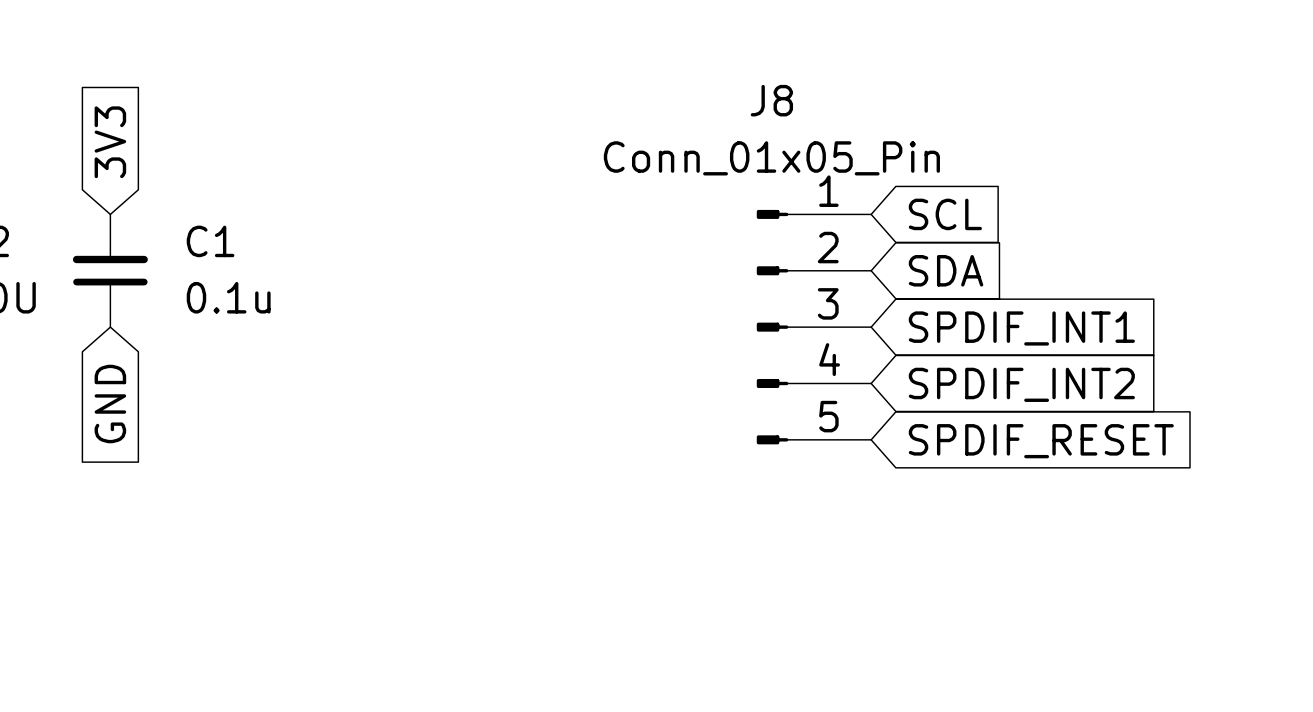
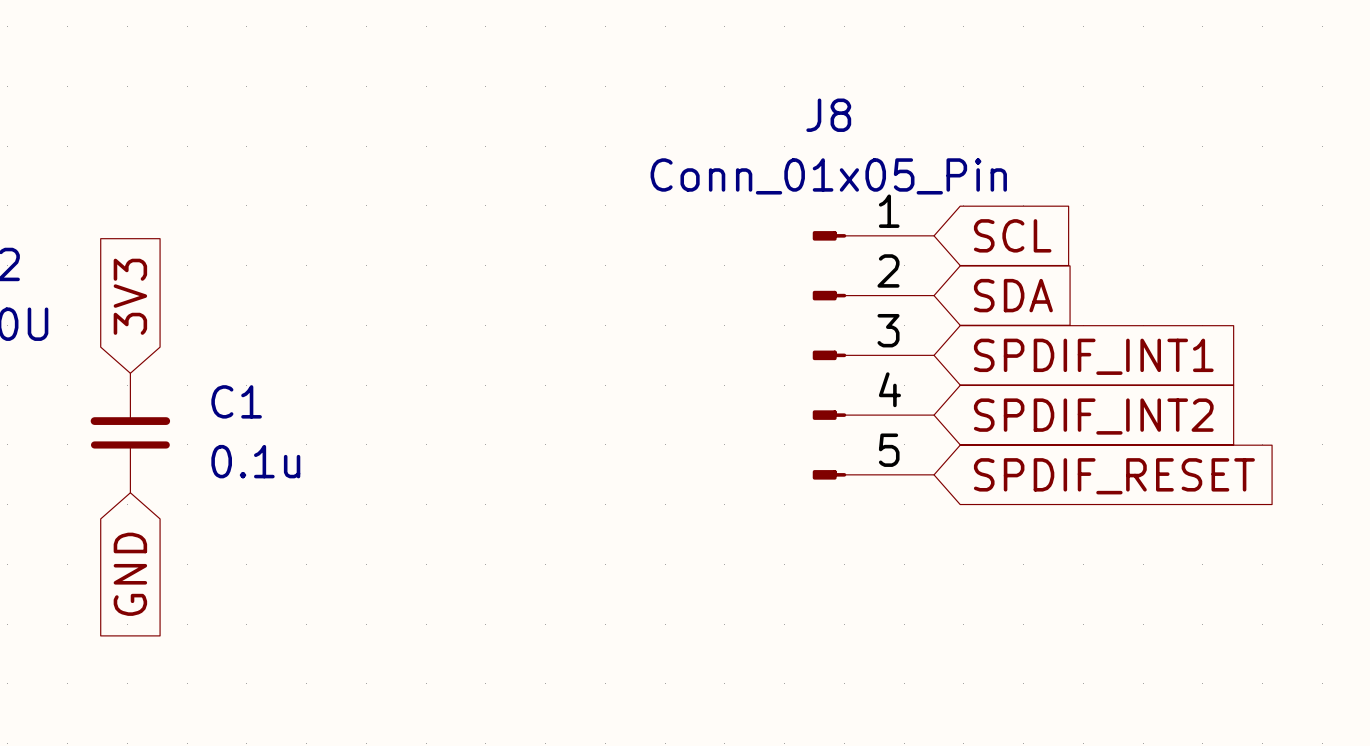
global label position: 3V3 (110, 142) -> 3V3 (130, 296)
C1 position: (110, 270) -> (130, 433)
global label position: GND (110, 404) -> GND (130, 574)

